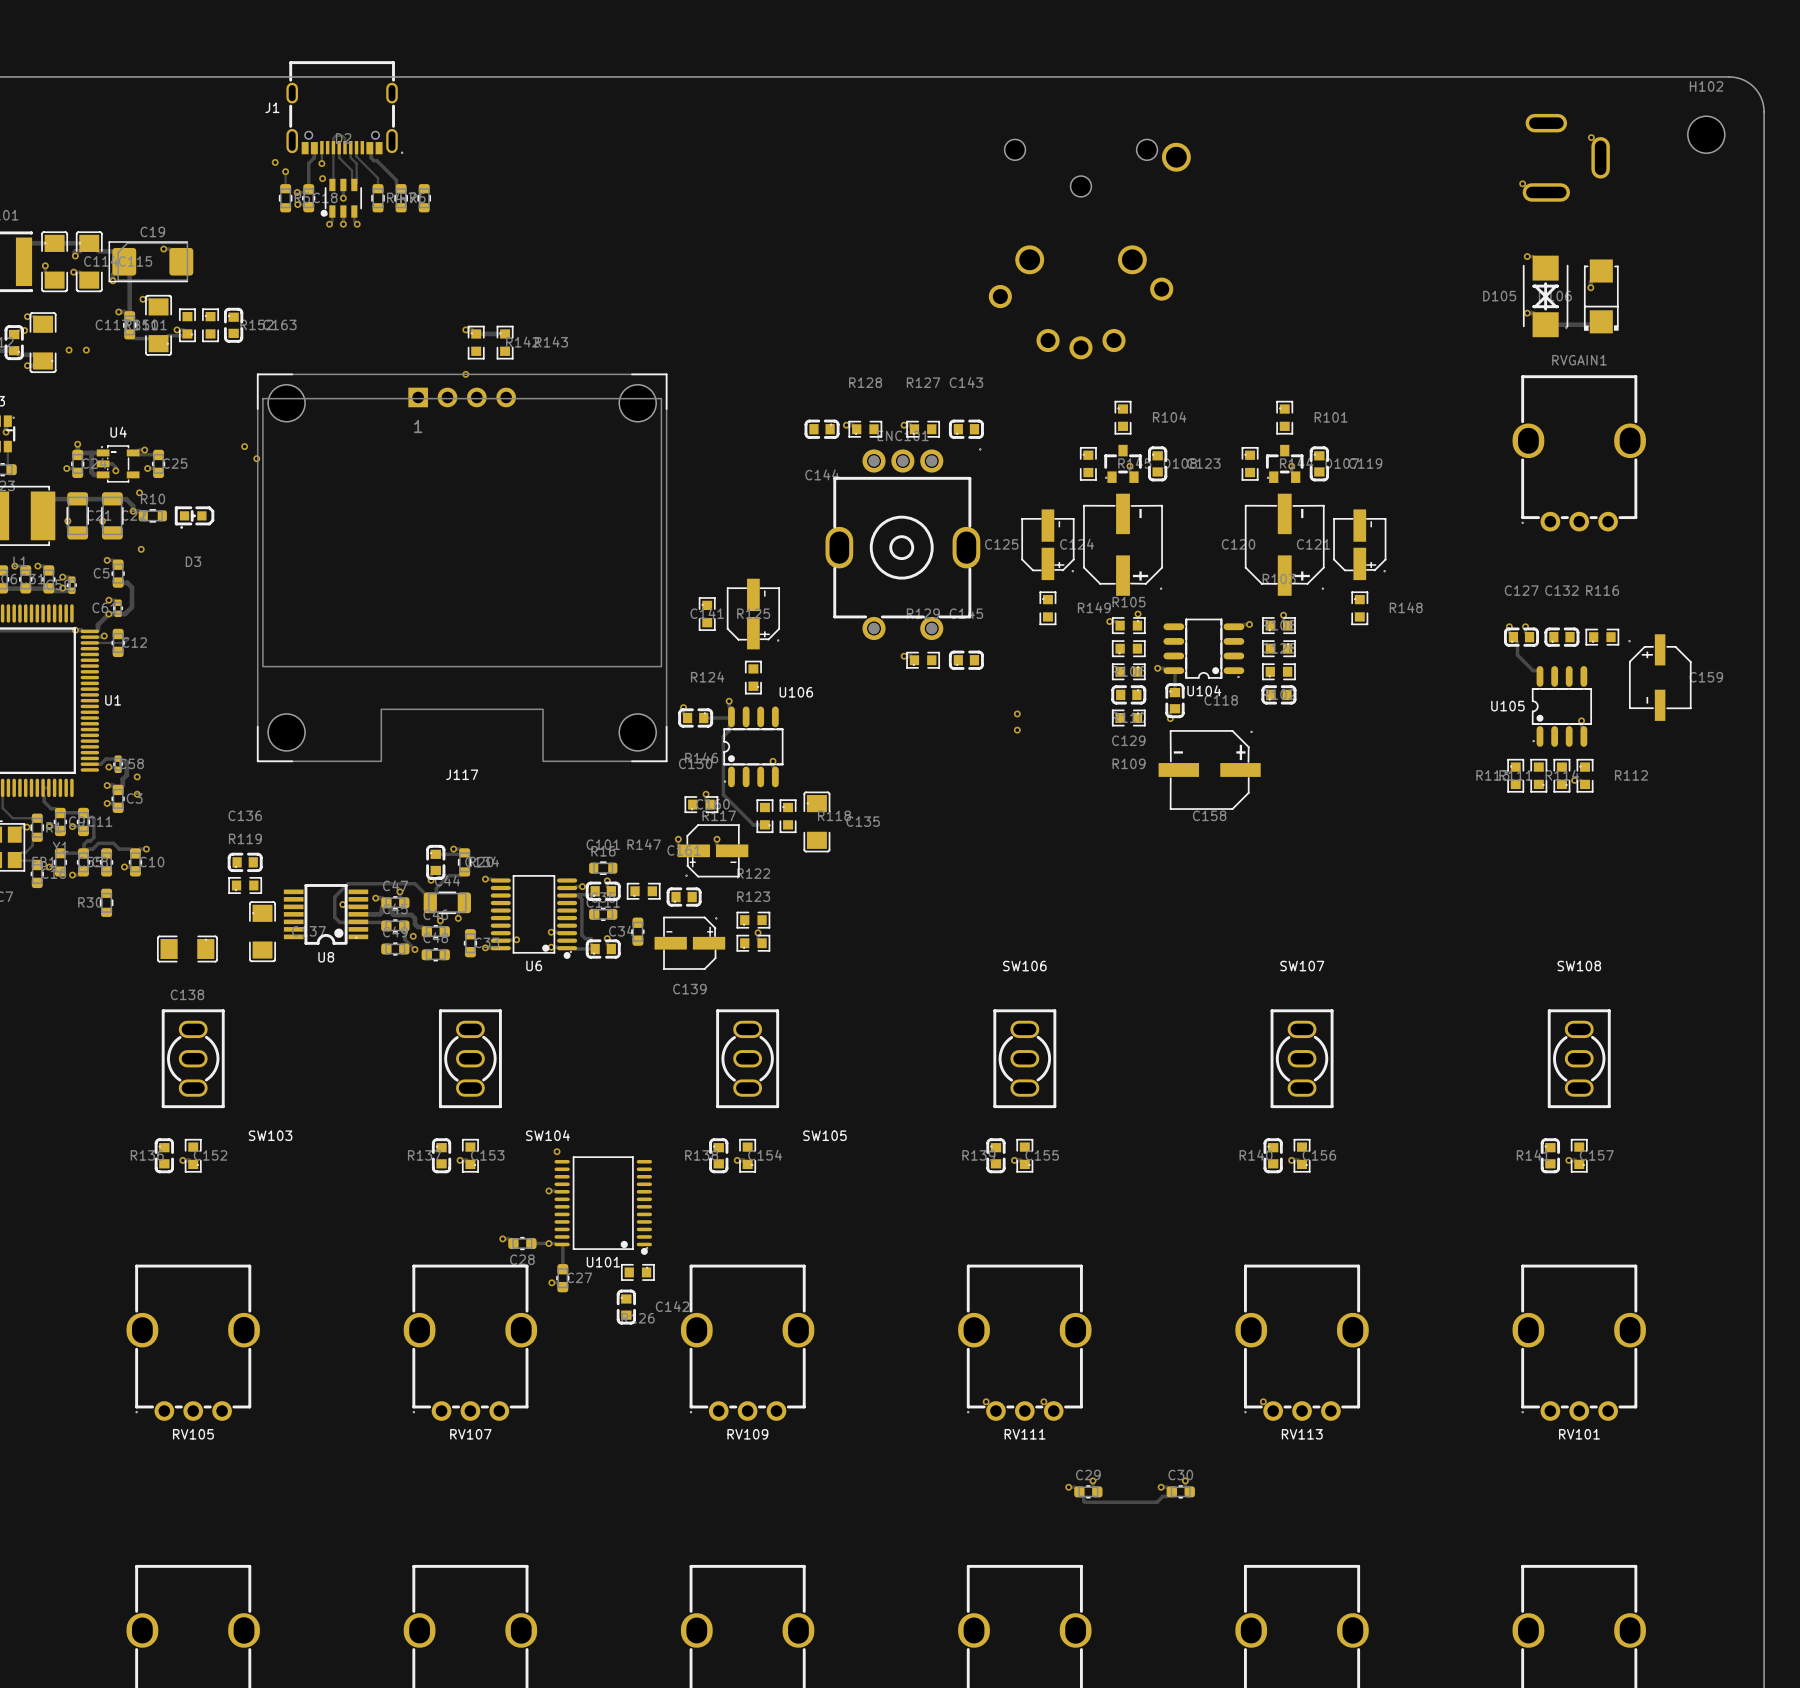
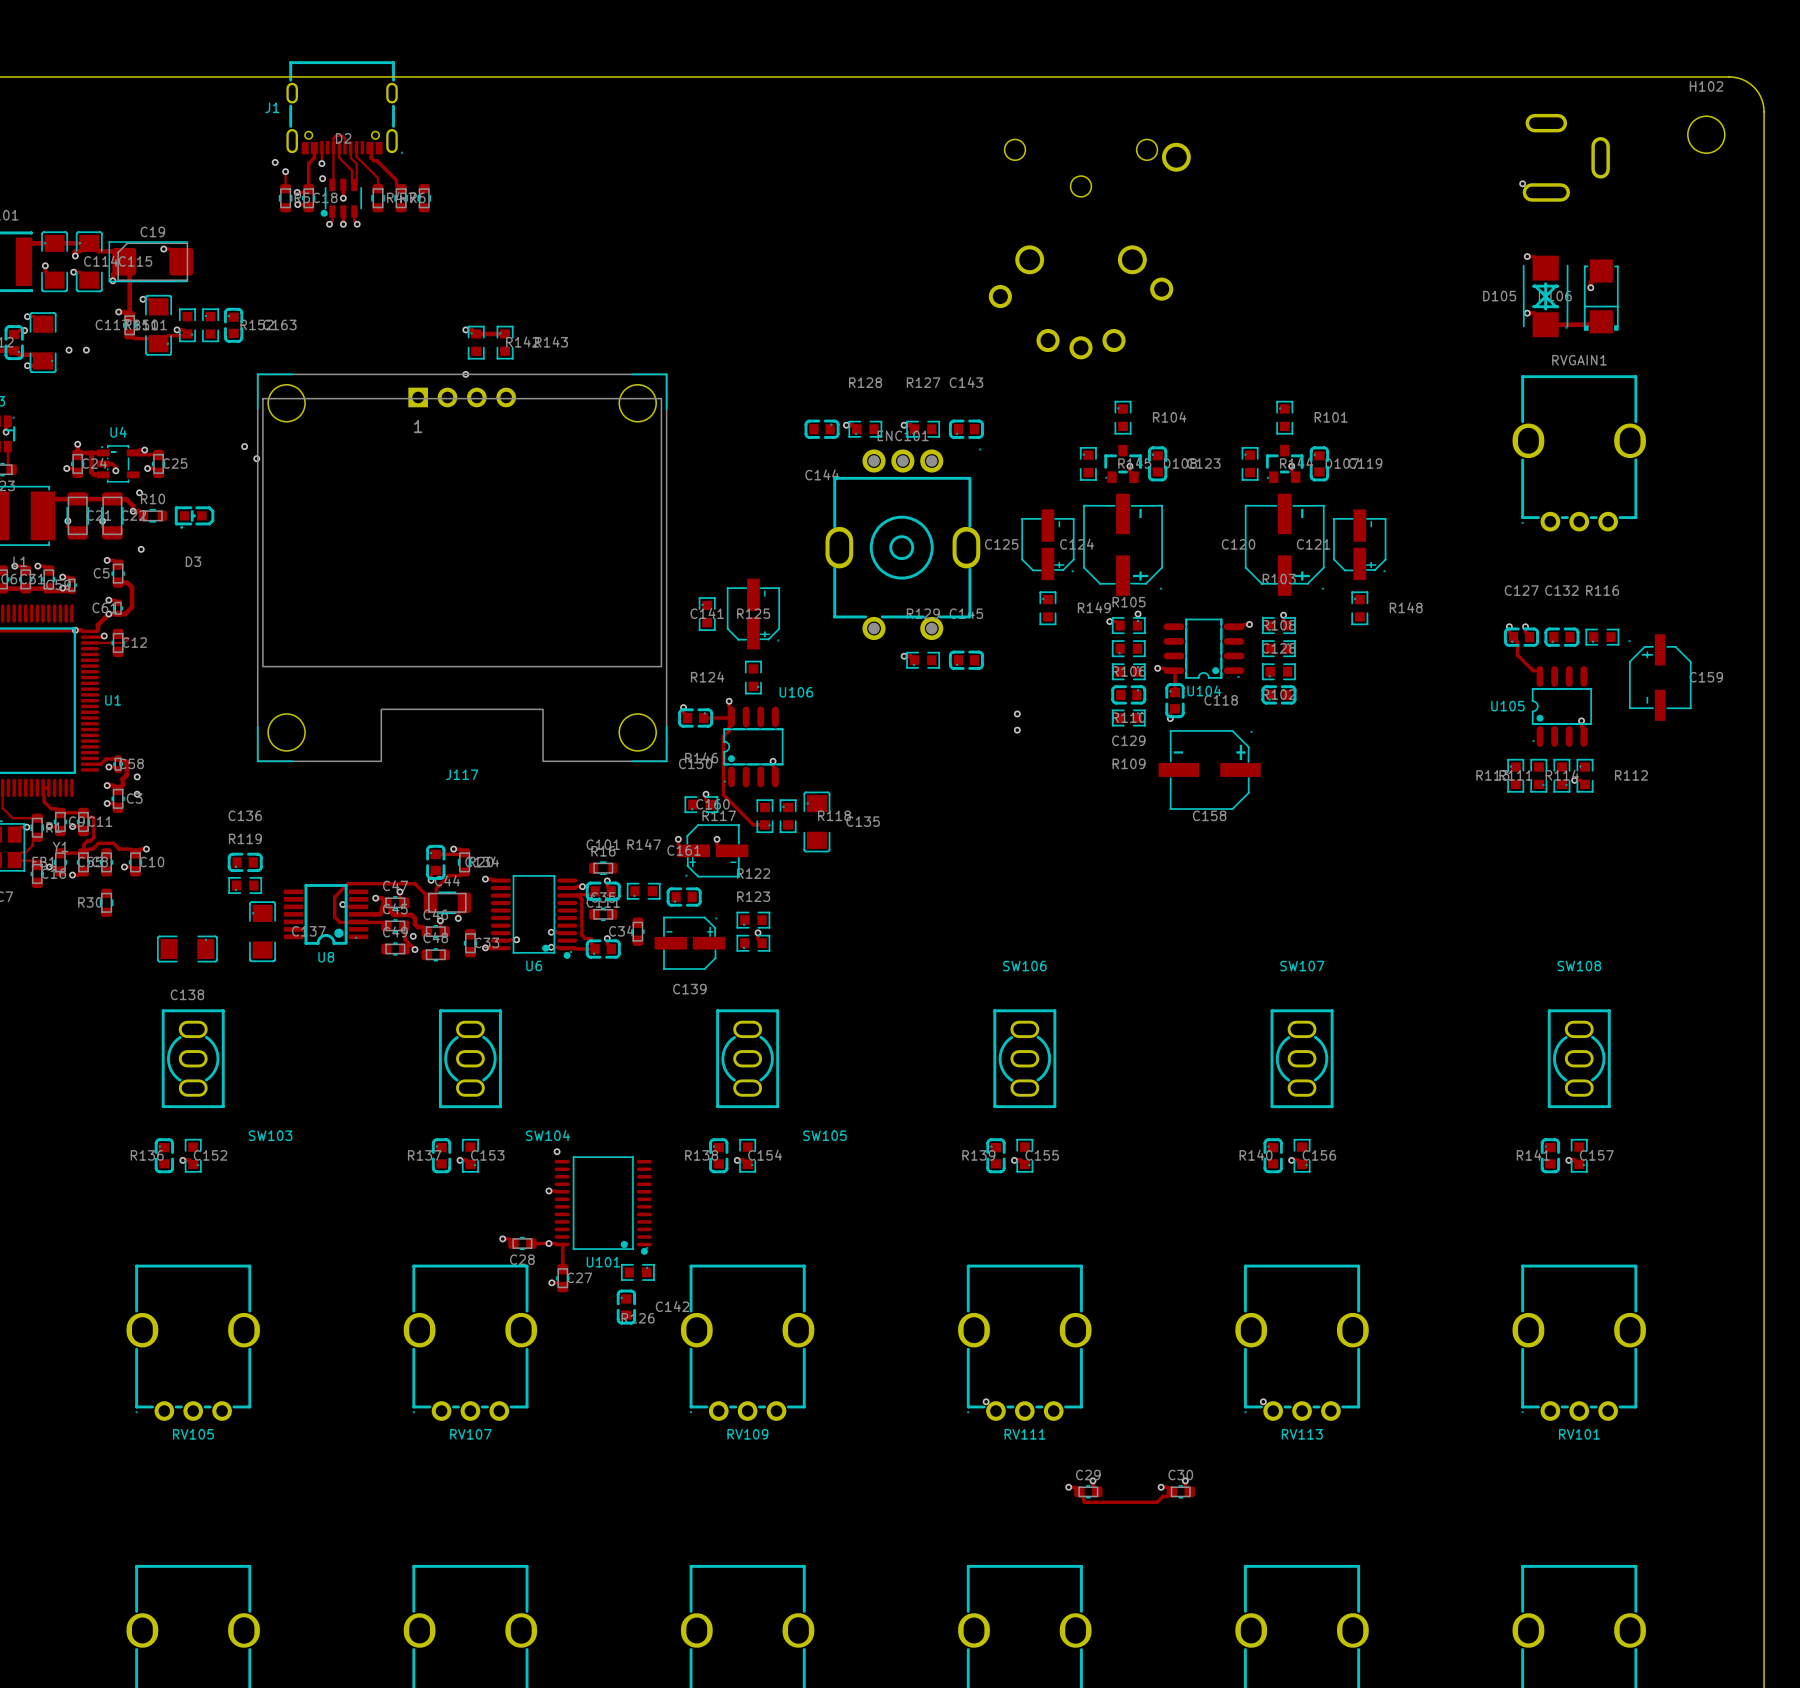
via: (1591, 137) -> none
via: (1043, 1401) -> none

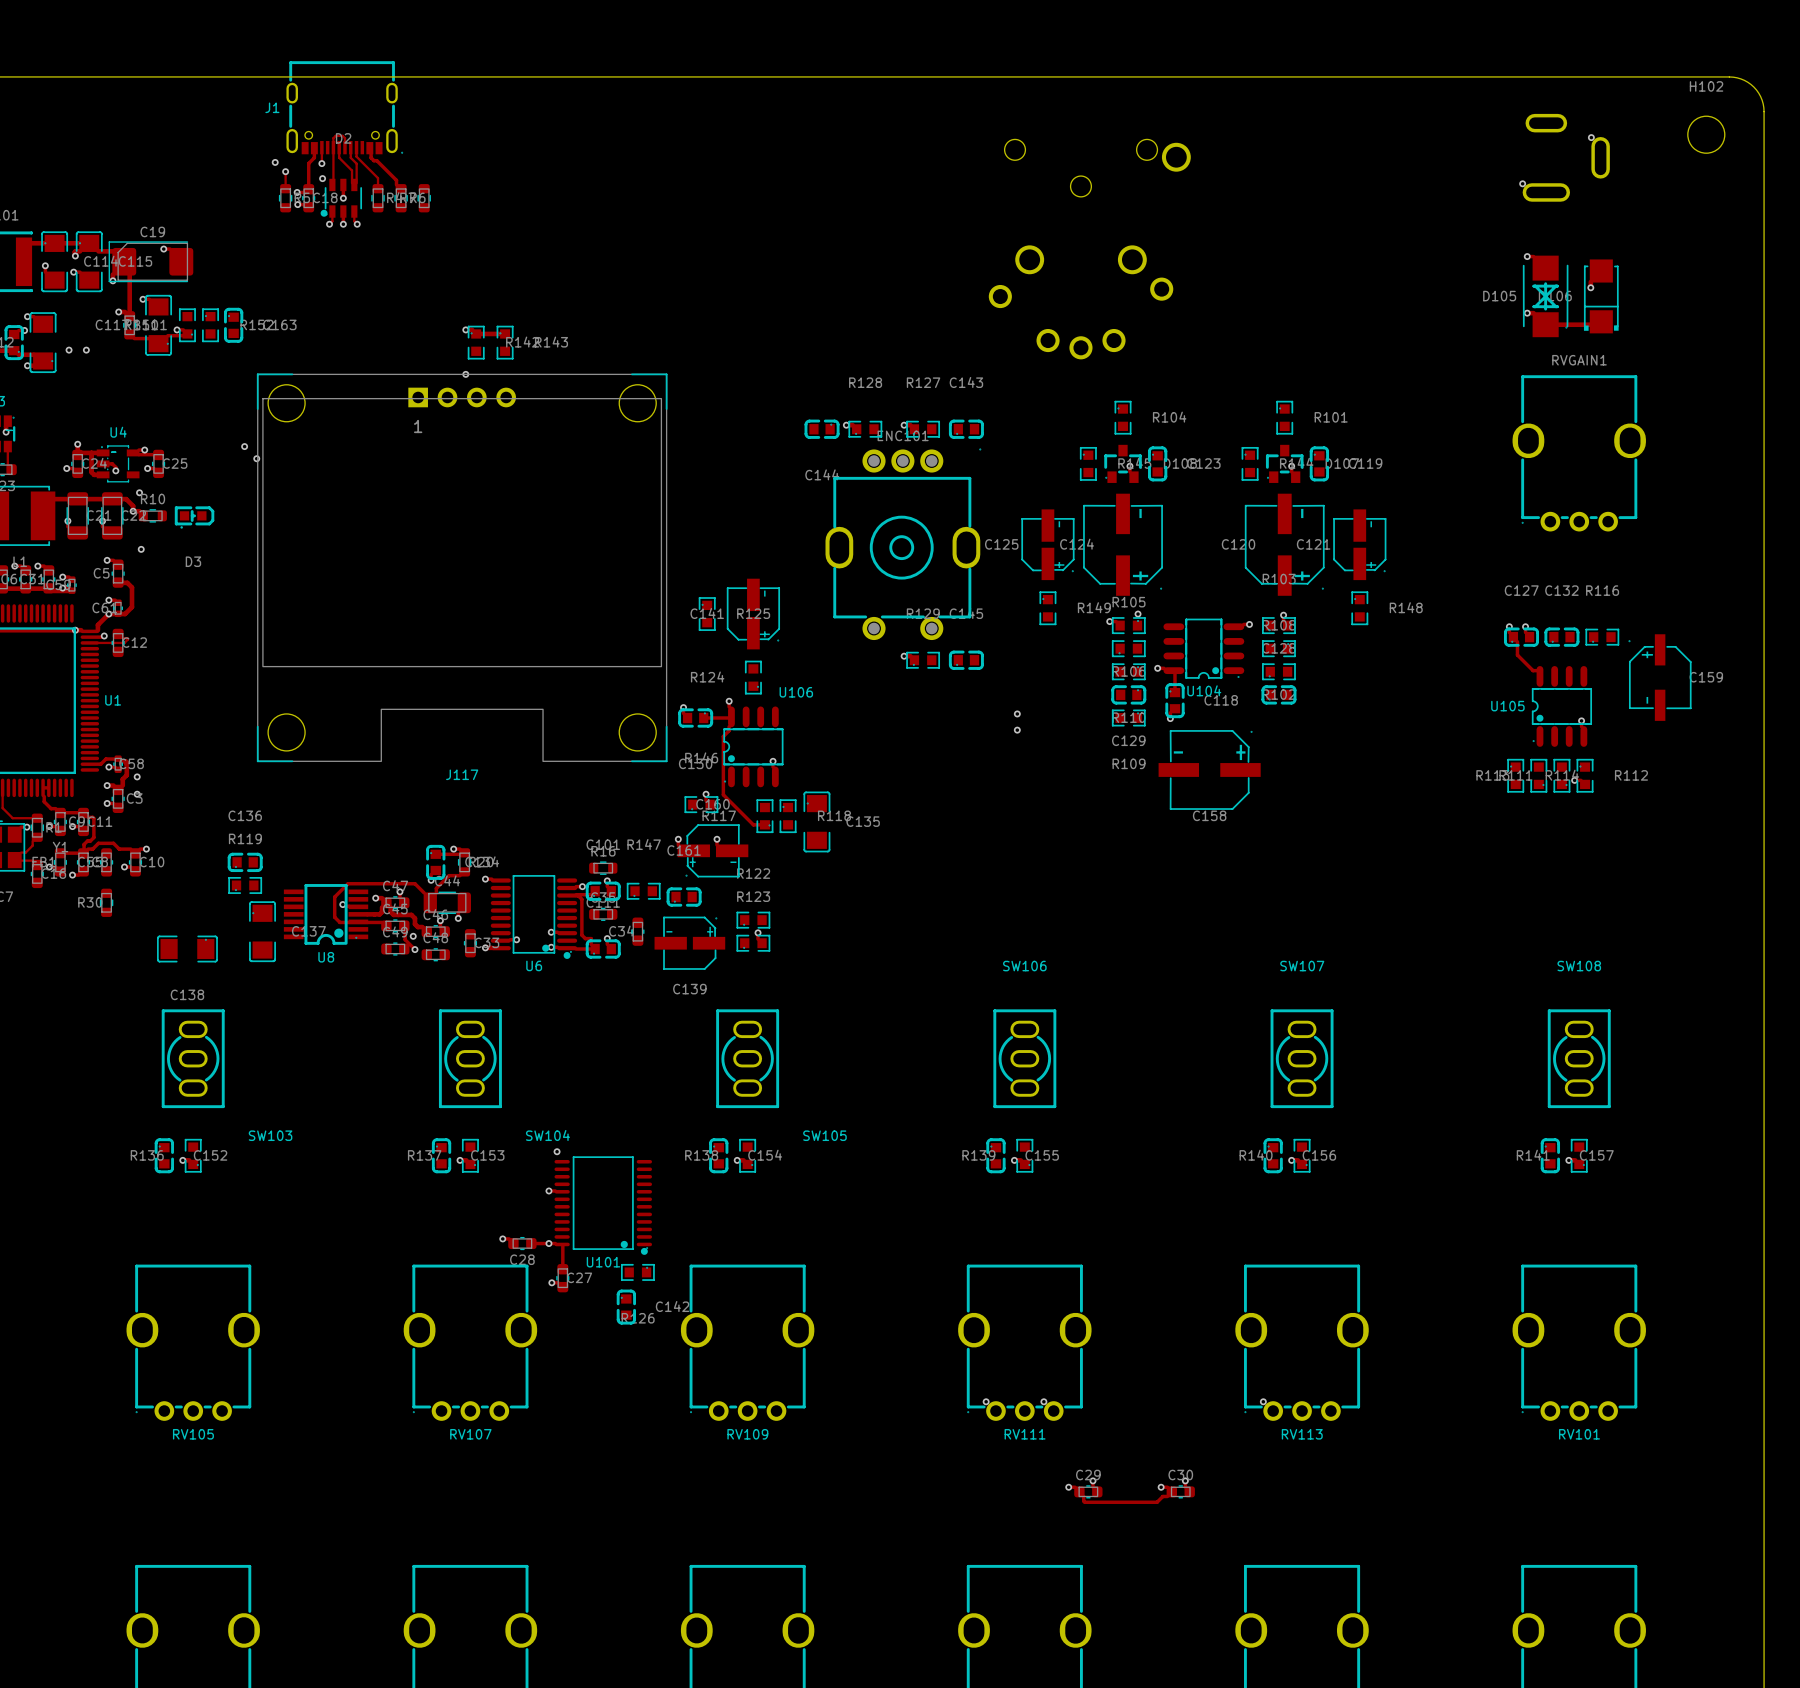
via: none -> (1591, 137)
via: none -> (1043, 1401)

